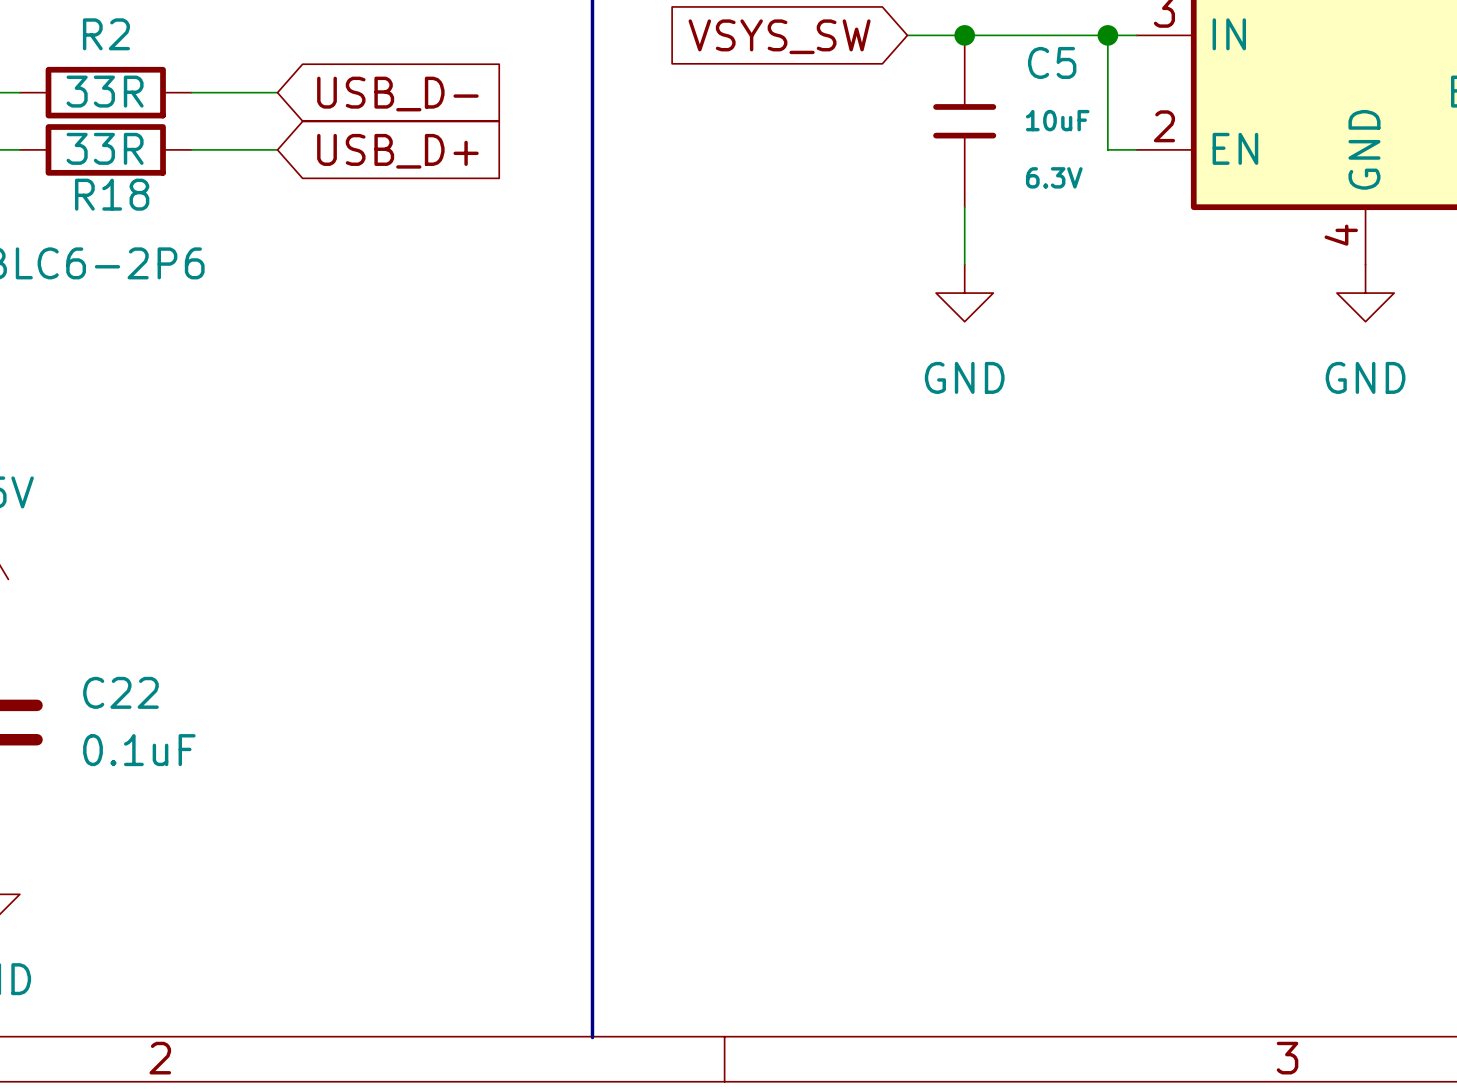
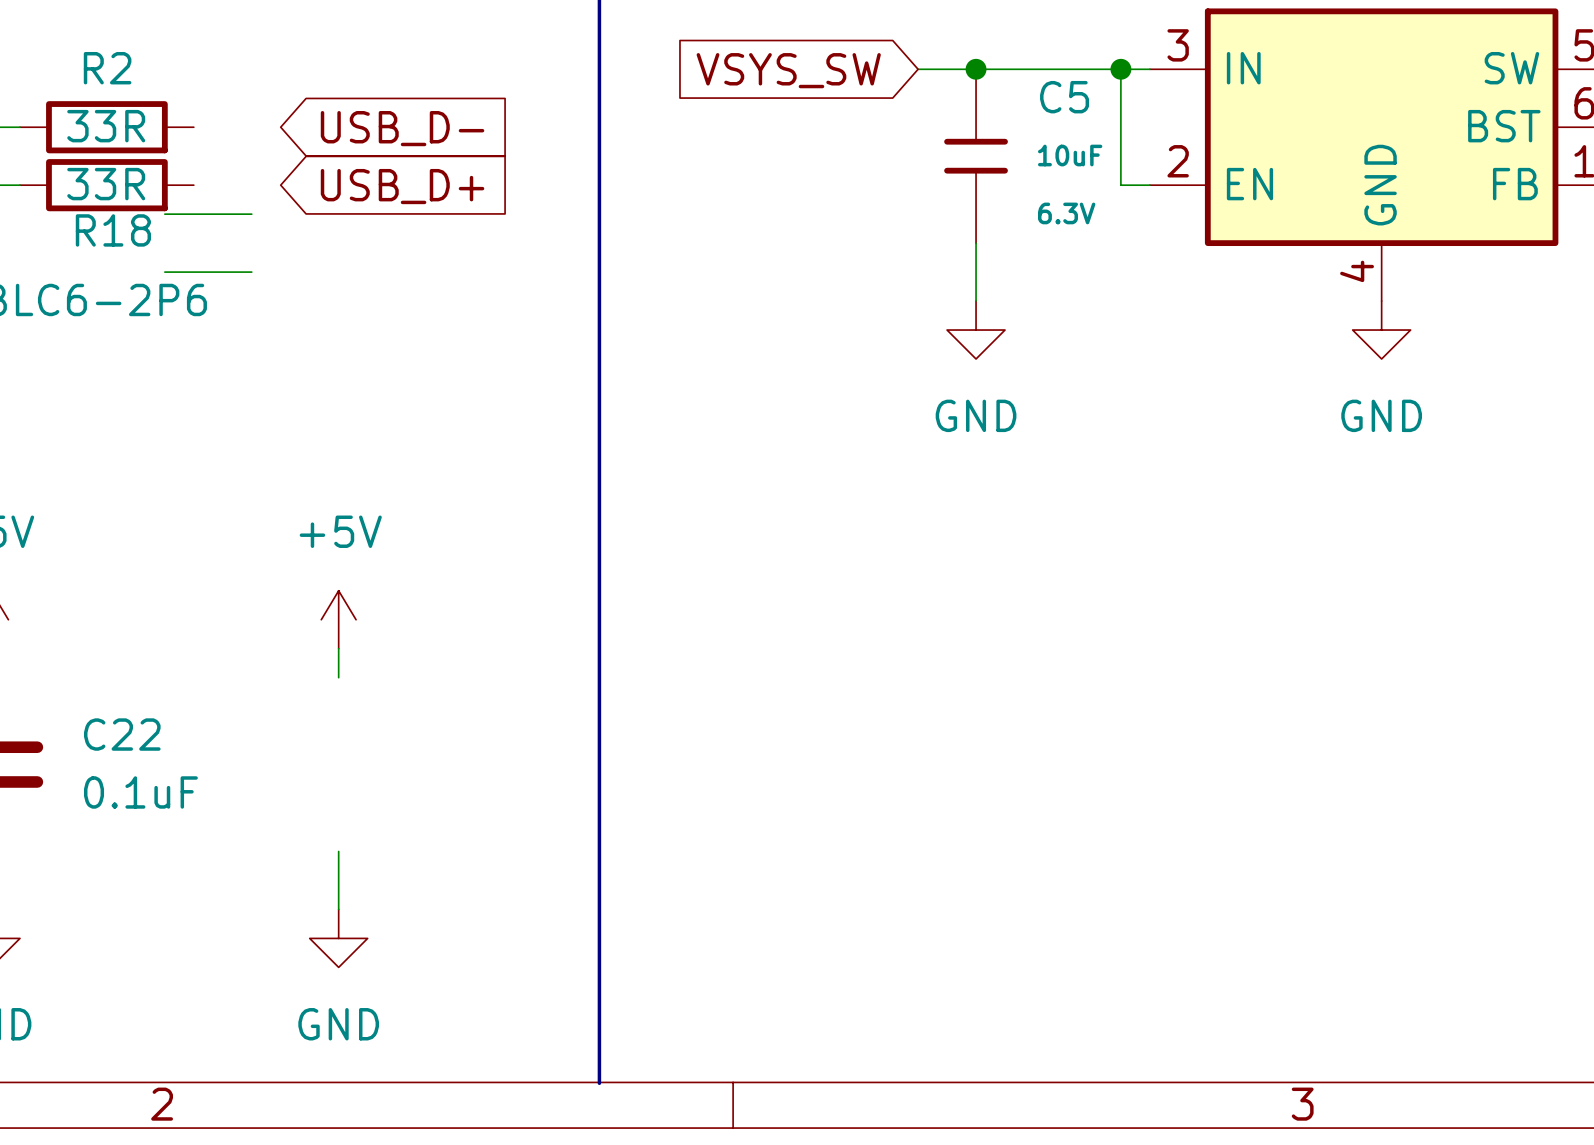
wire: (191, 92) (277, 92) -> (164, 214) (251, 214)
wire: (191, 149) (277, 149) -> (164, 272) (251, 272)
power symbol: none -> +5V (338, 619)
wire: none -> (338, 648) (338, 677)
wire: none -> (338, 851) (338, 909)
power symbol: none -> GND (338, 938)

